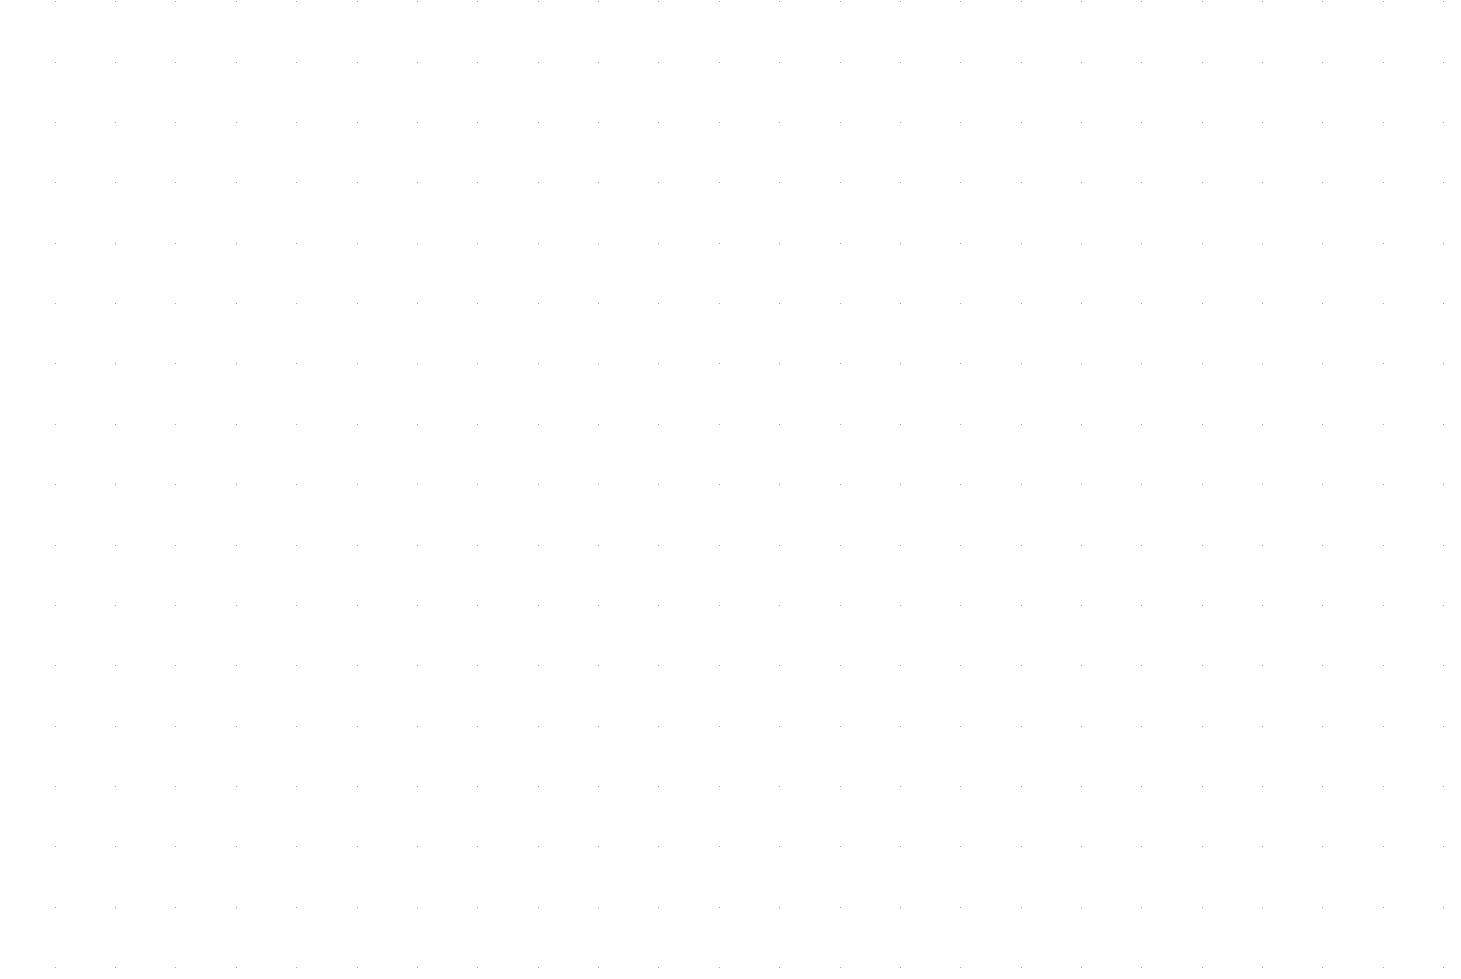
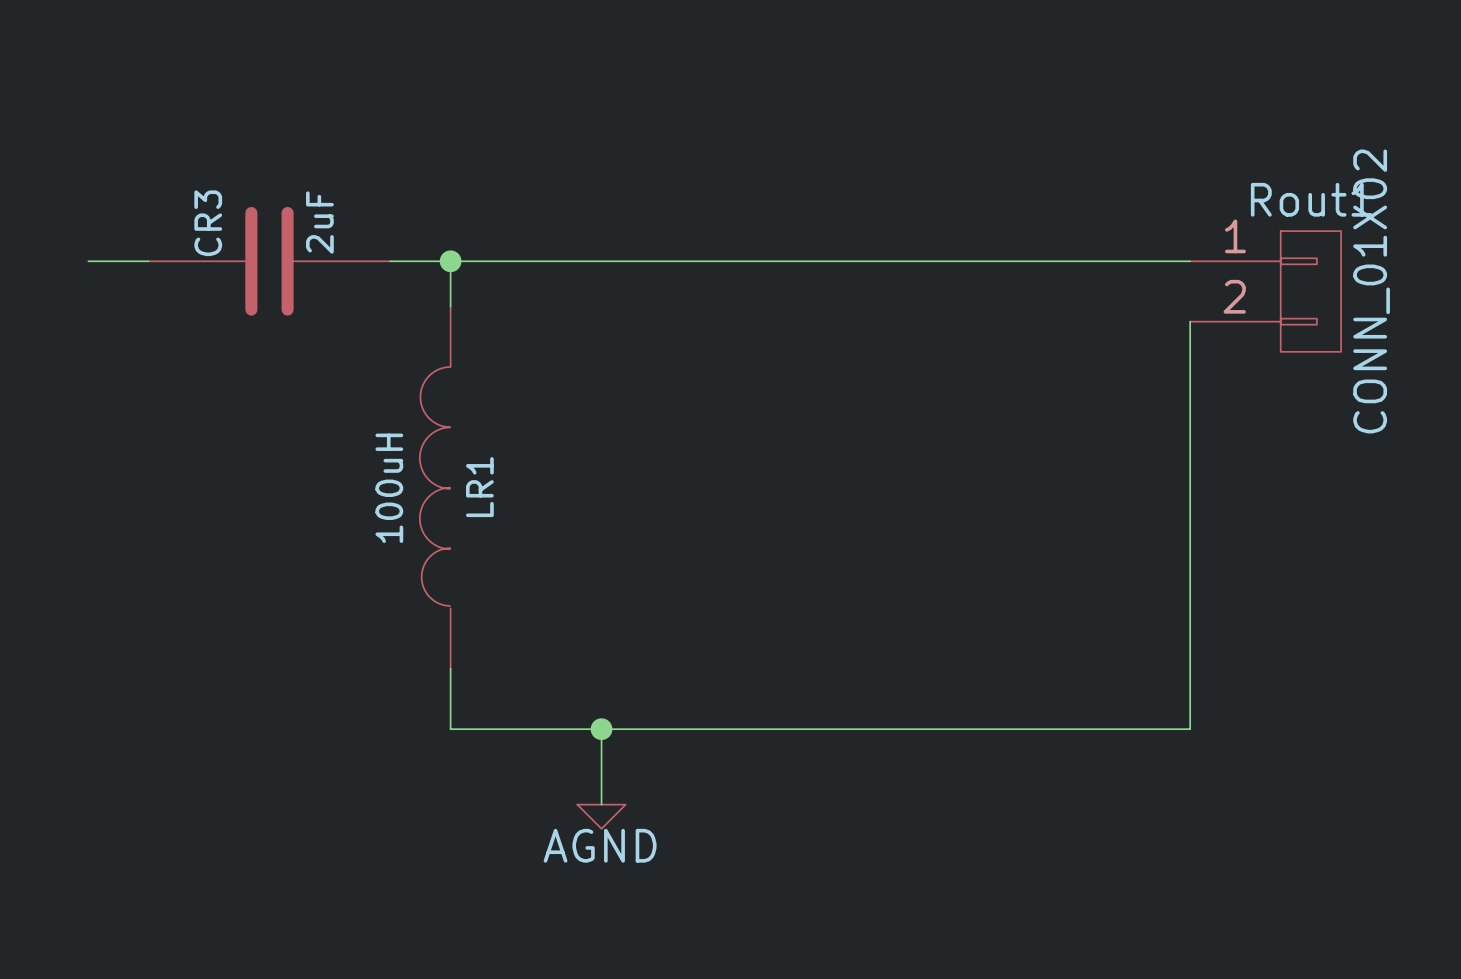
wire: none -> (88, 261) (148, 261)
CR3: none -> 2uF (269, 261)
wire: none -> (390, 261) (1190, 261)
wire: none -> (450, 261) (450, 306)
junction: none -> (450, 261)
Rout1: none -> CONN_01X02 (1265, 291)
wire: none -> (1190, 321) (1190, 729) (450, 729) (450, 668)
LR1: none -> 100uH (435, 487)
wire: none -> (601, 729) (601, 804)
junction: none -> (601, 729)
power symbol: none -> AGND (601, 816)

